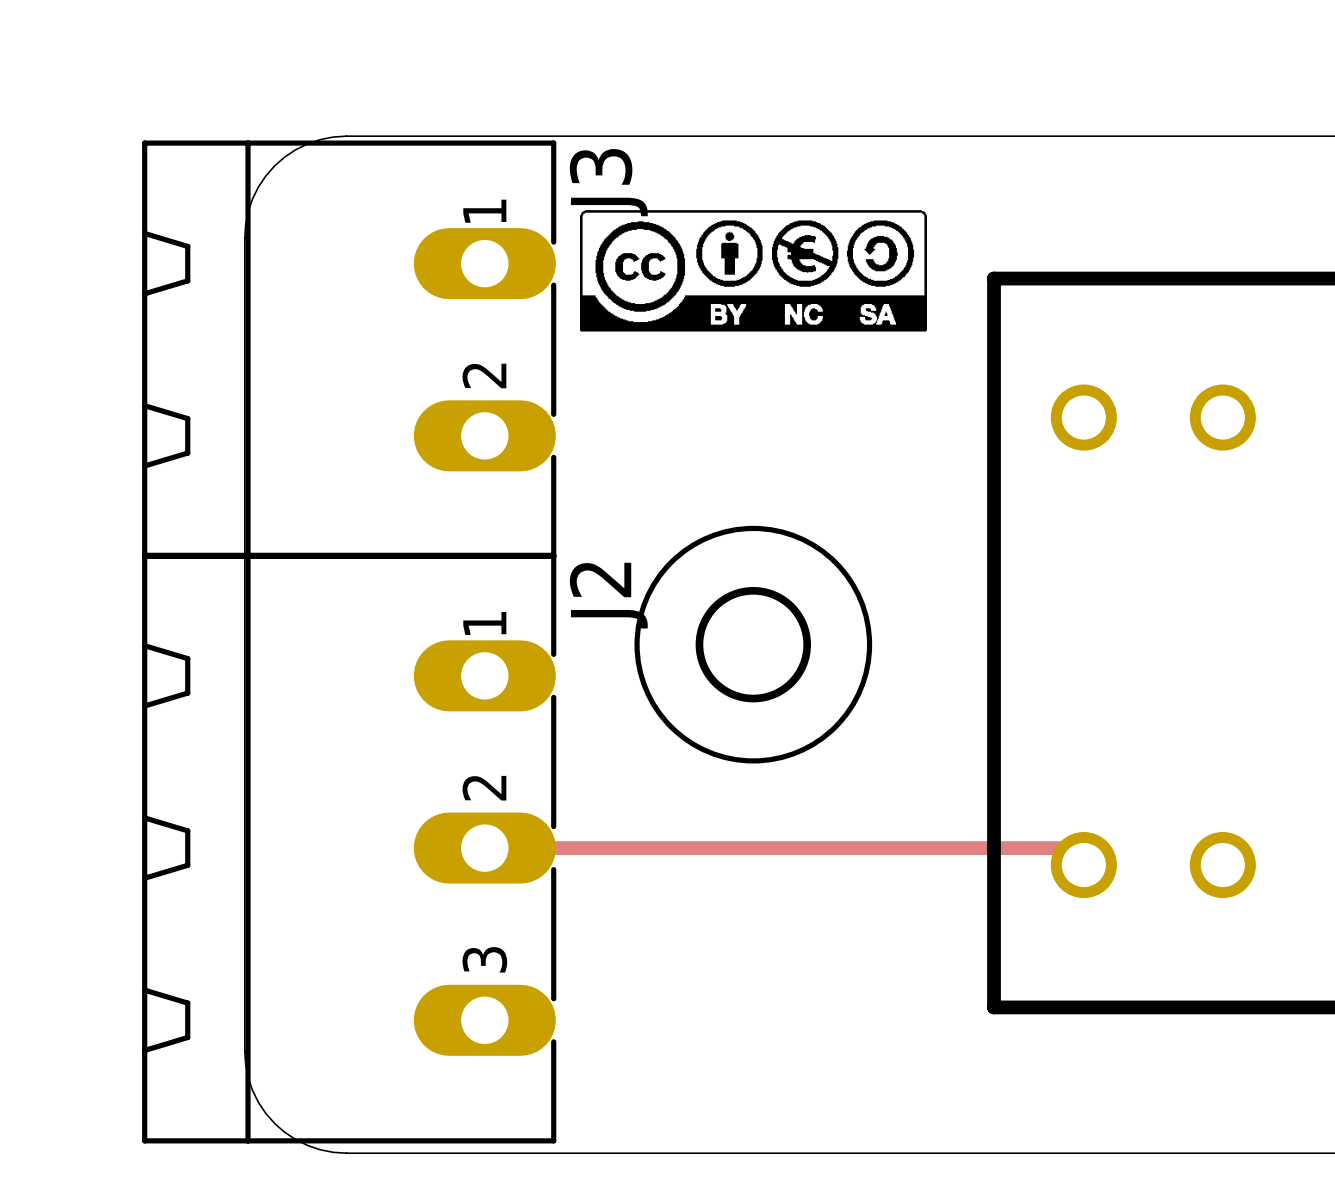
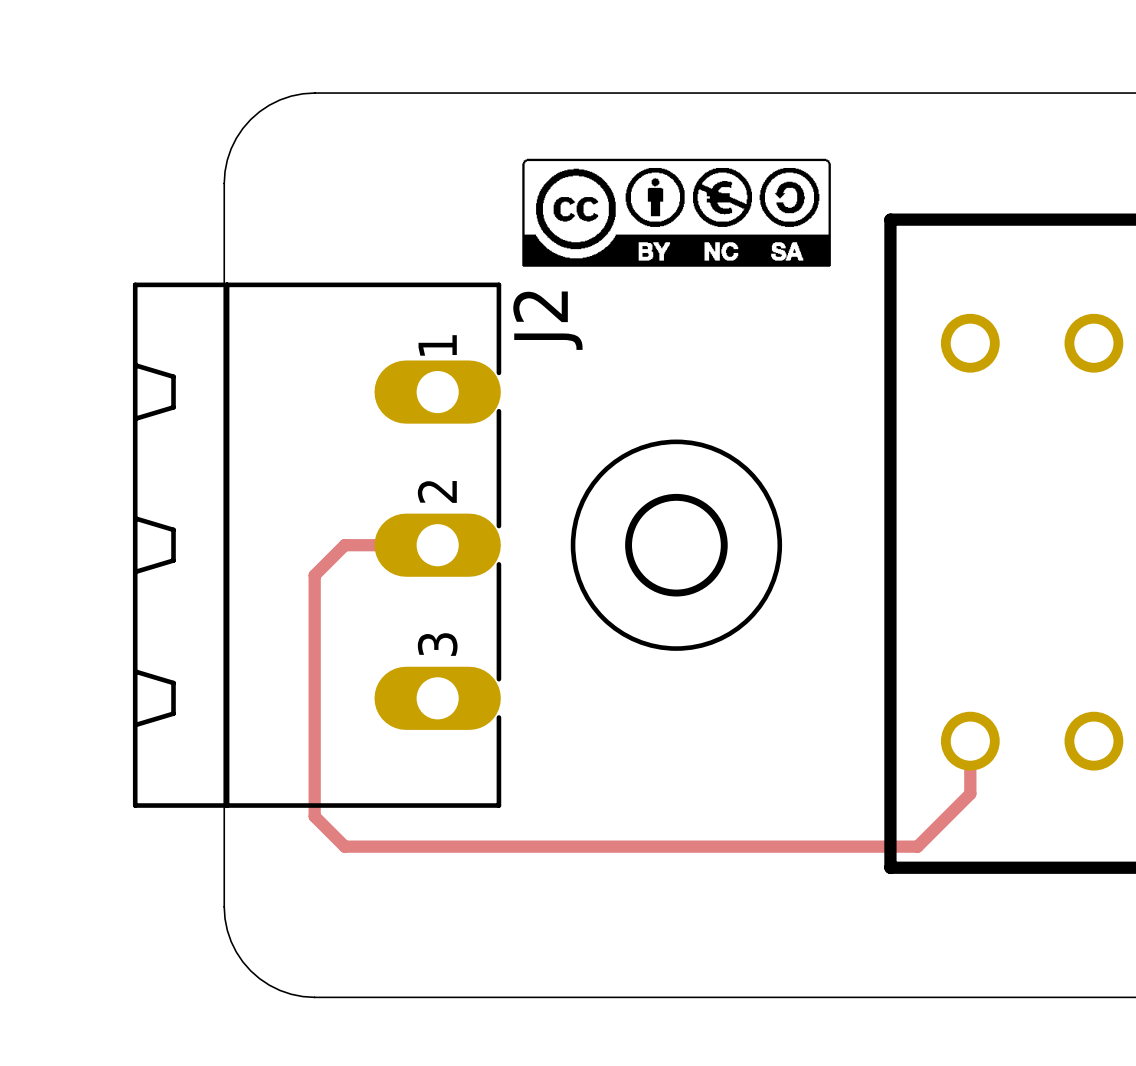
J3: (349, 349) -> none
J2 position: (349, 848) -> (317, 545)
track: (484, 848) (1066, 848) (1083, 865) -> (437, 545) (344, 545) (314, 575) (314, 816) (344, 846) (917, 846) (970, 793) (970, 741)

